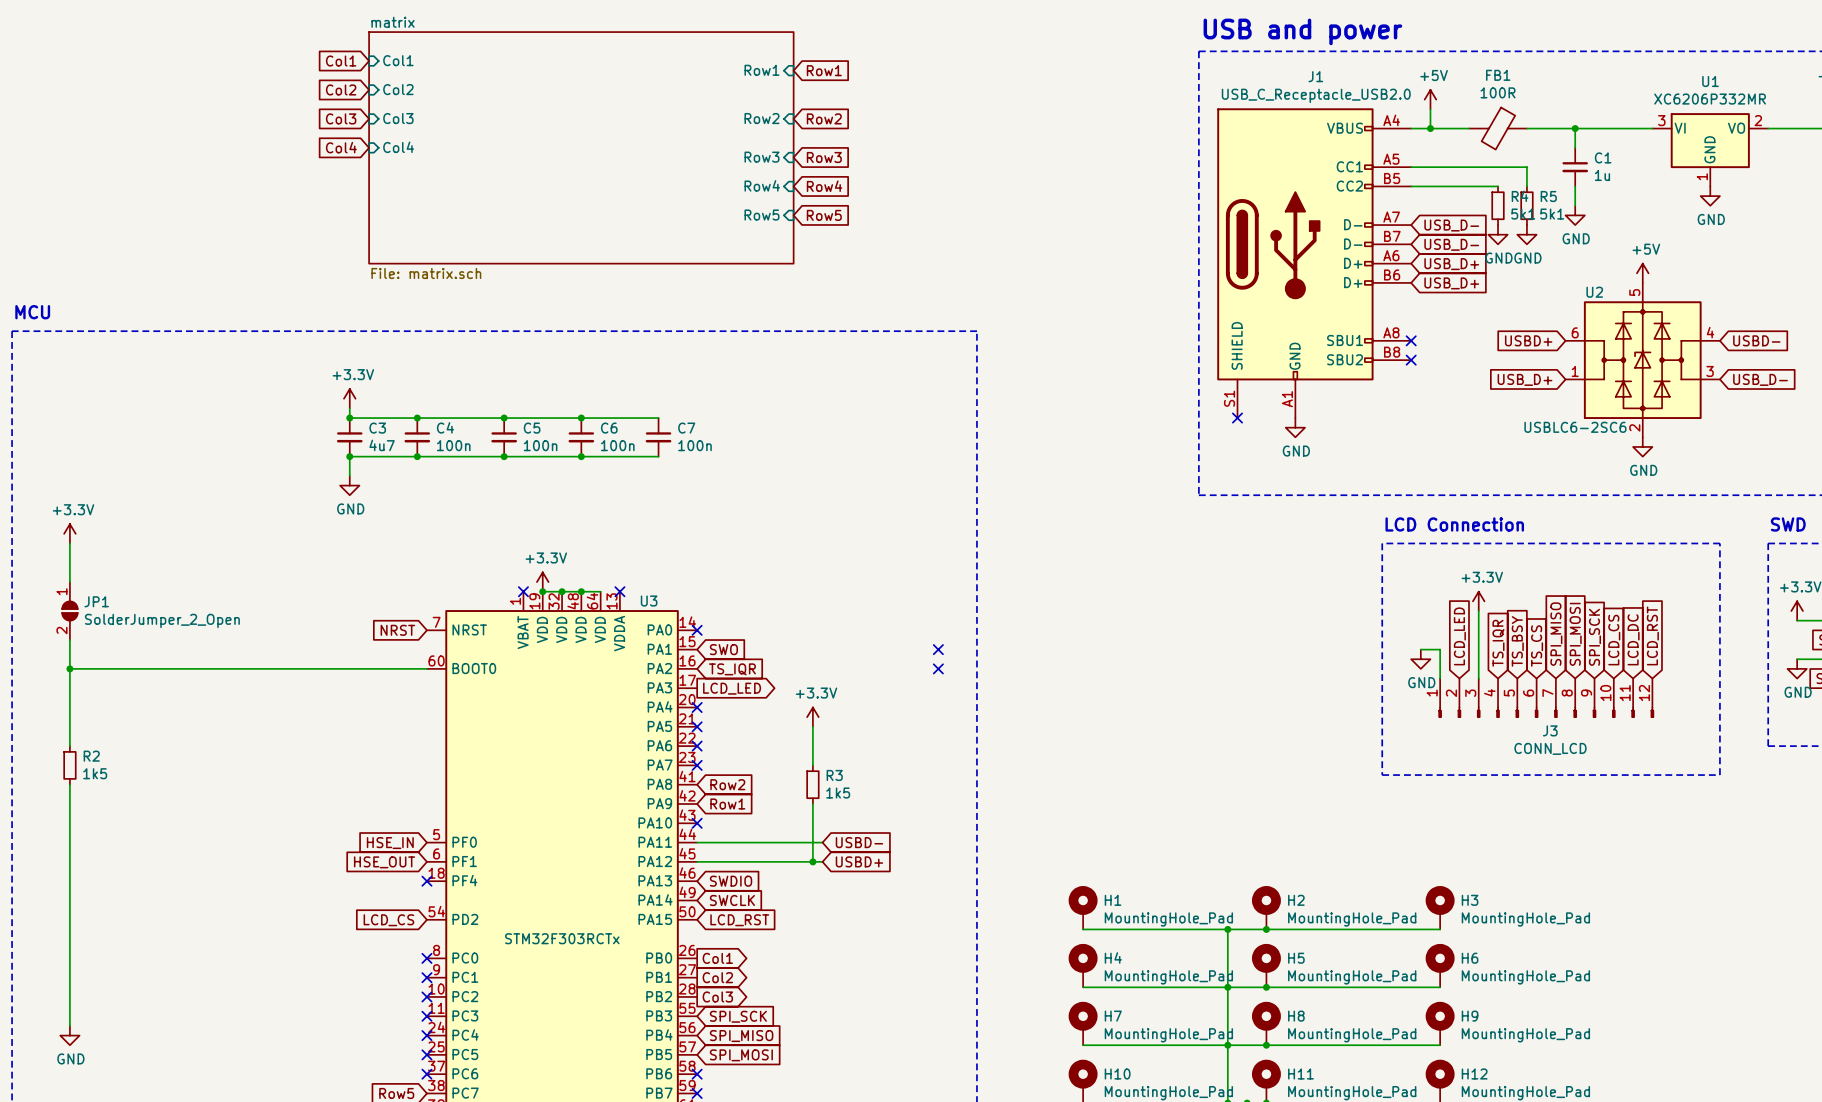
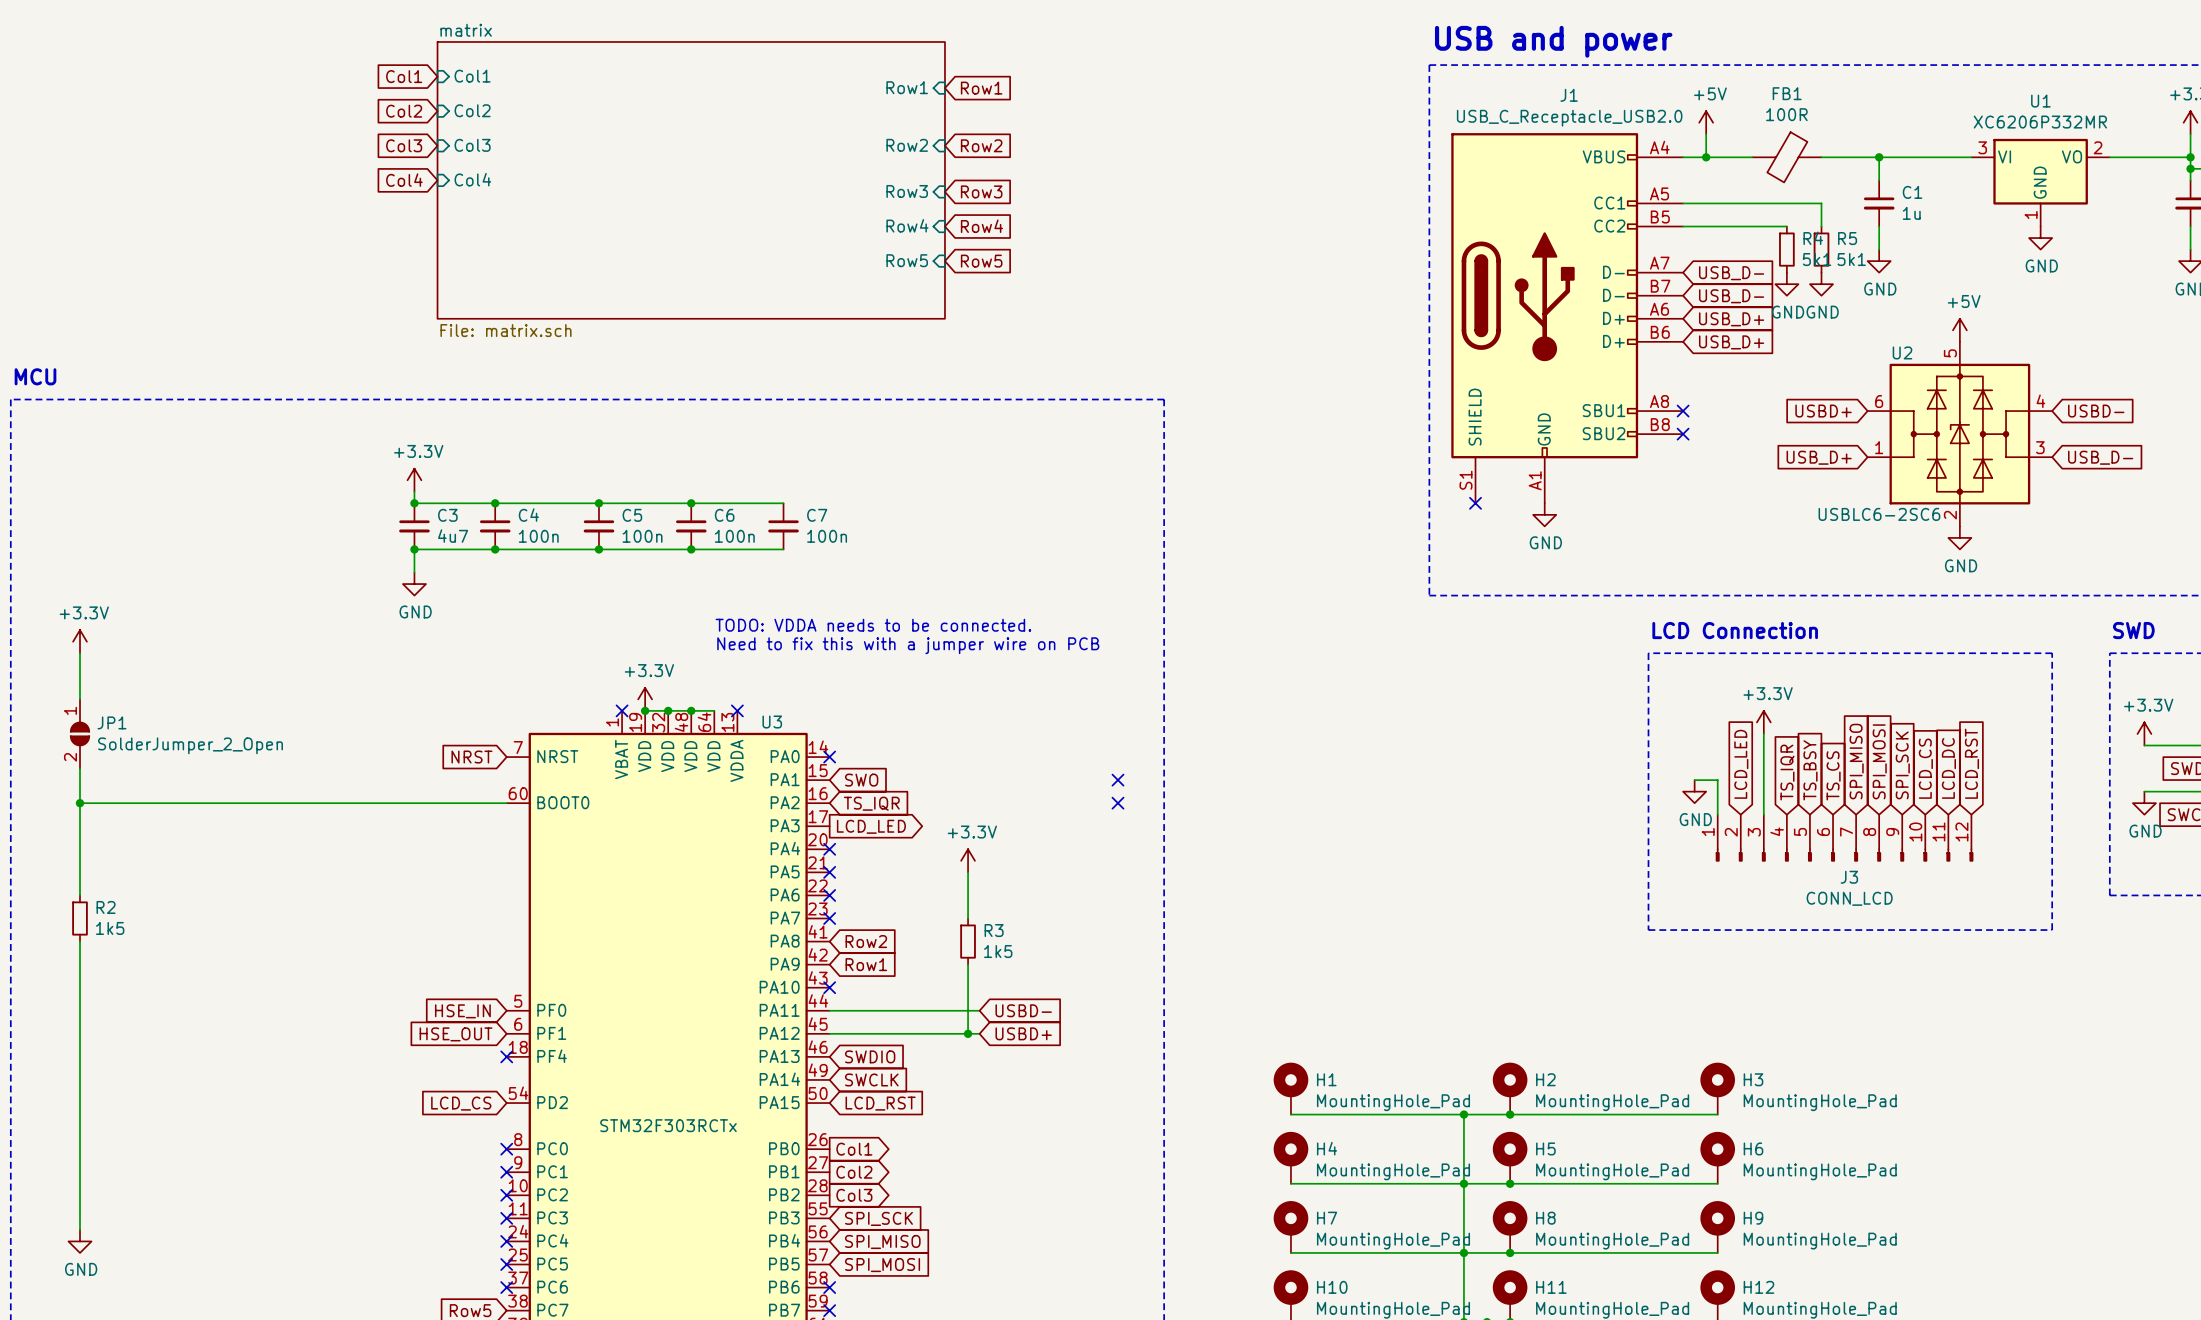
text: none -> TODO: VDDA needs to be connected. (873, 625)
text: none -> Need to fix this with a jumper wire on PCB (908, 645)

